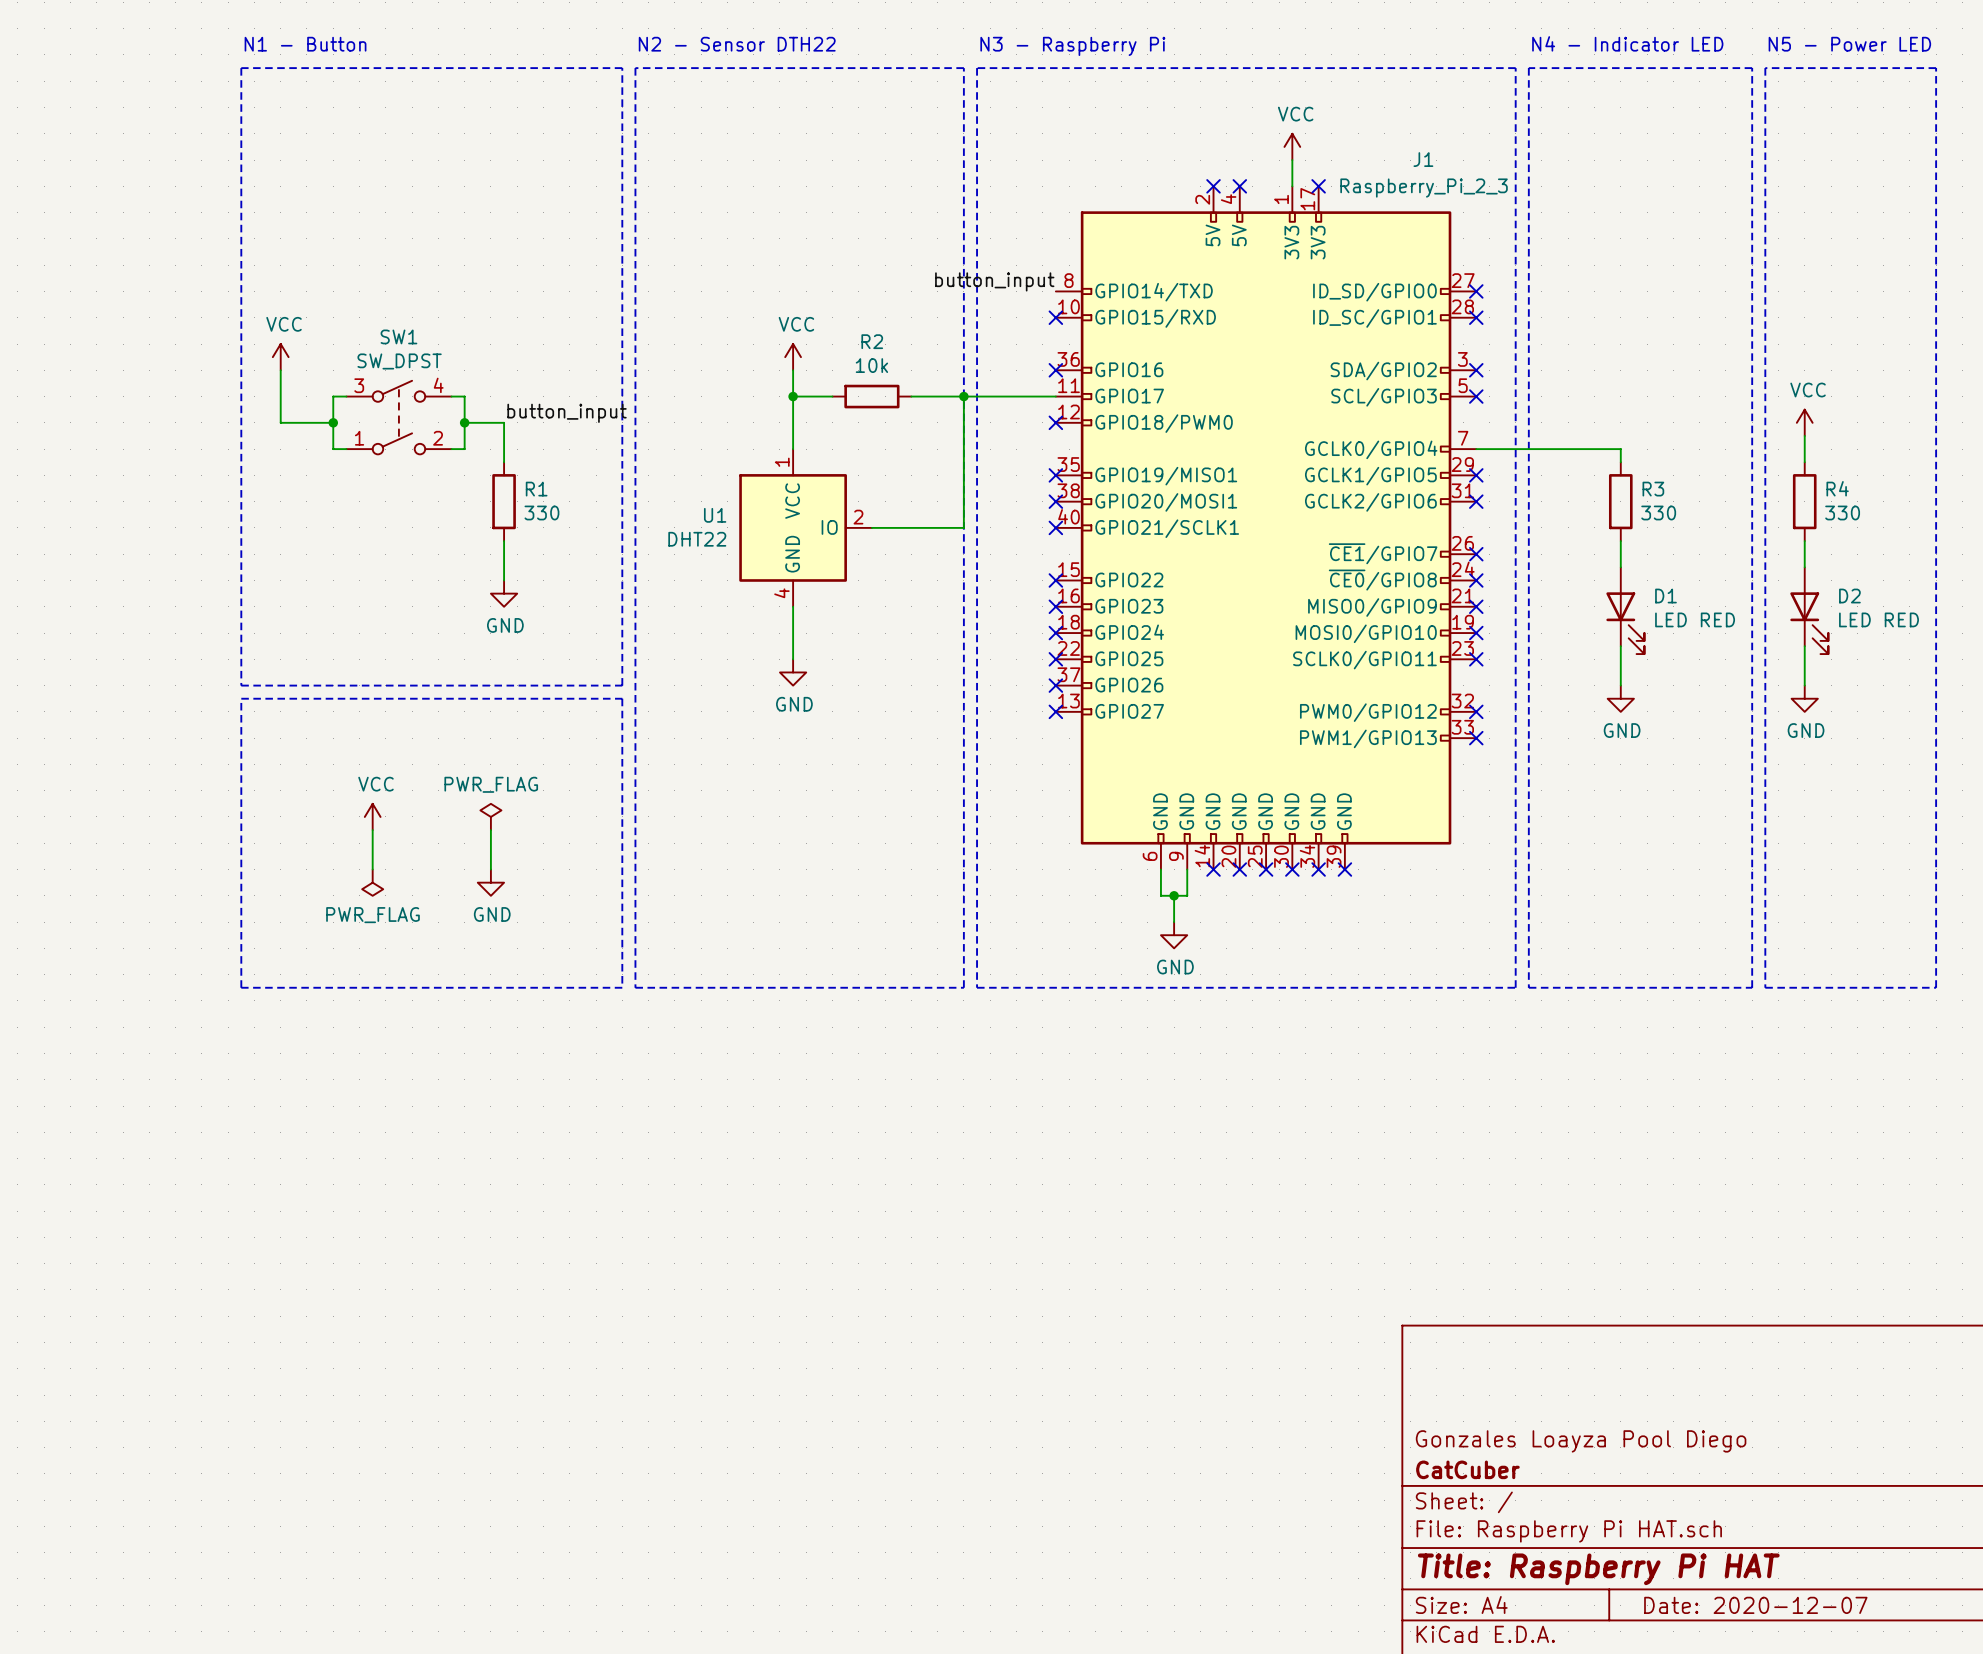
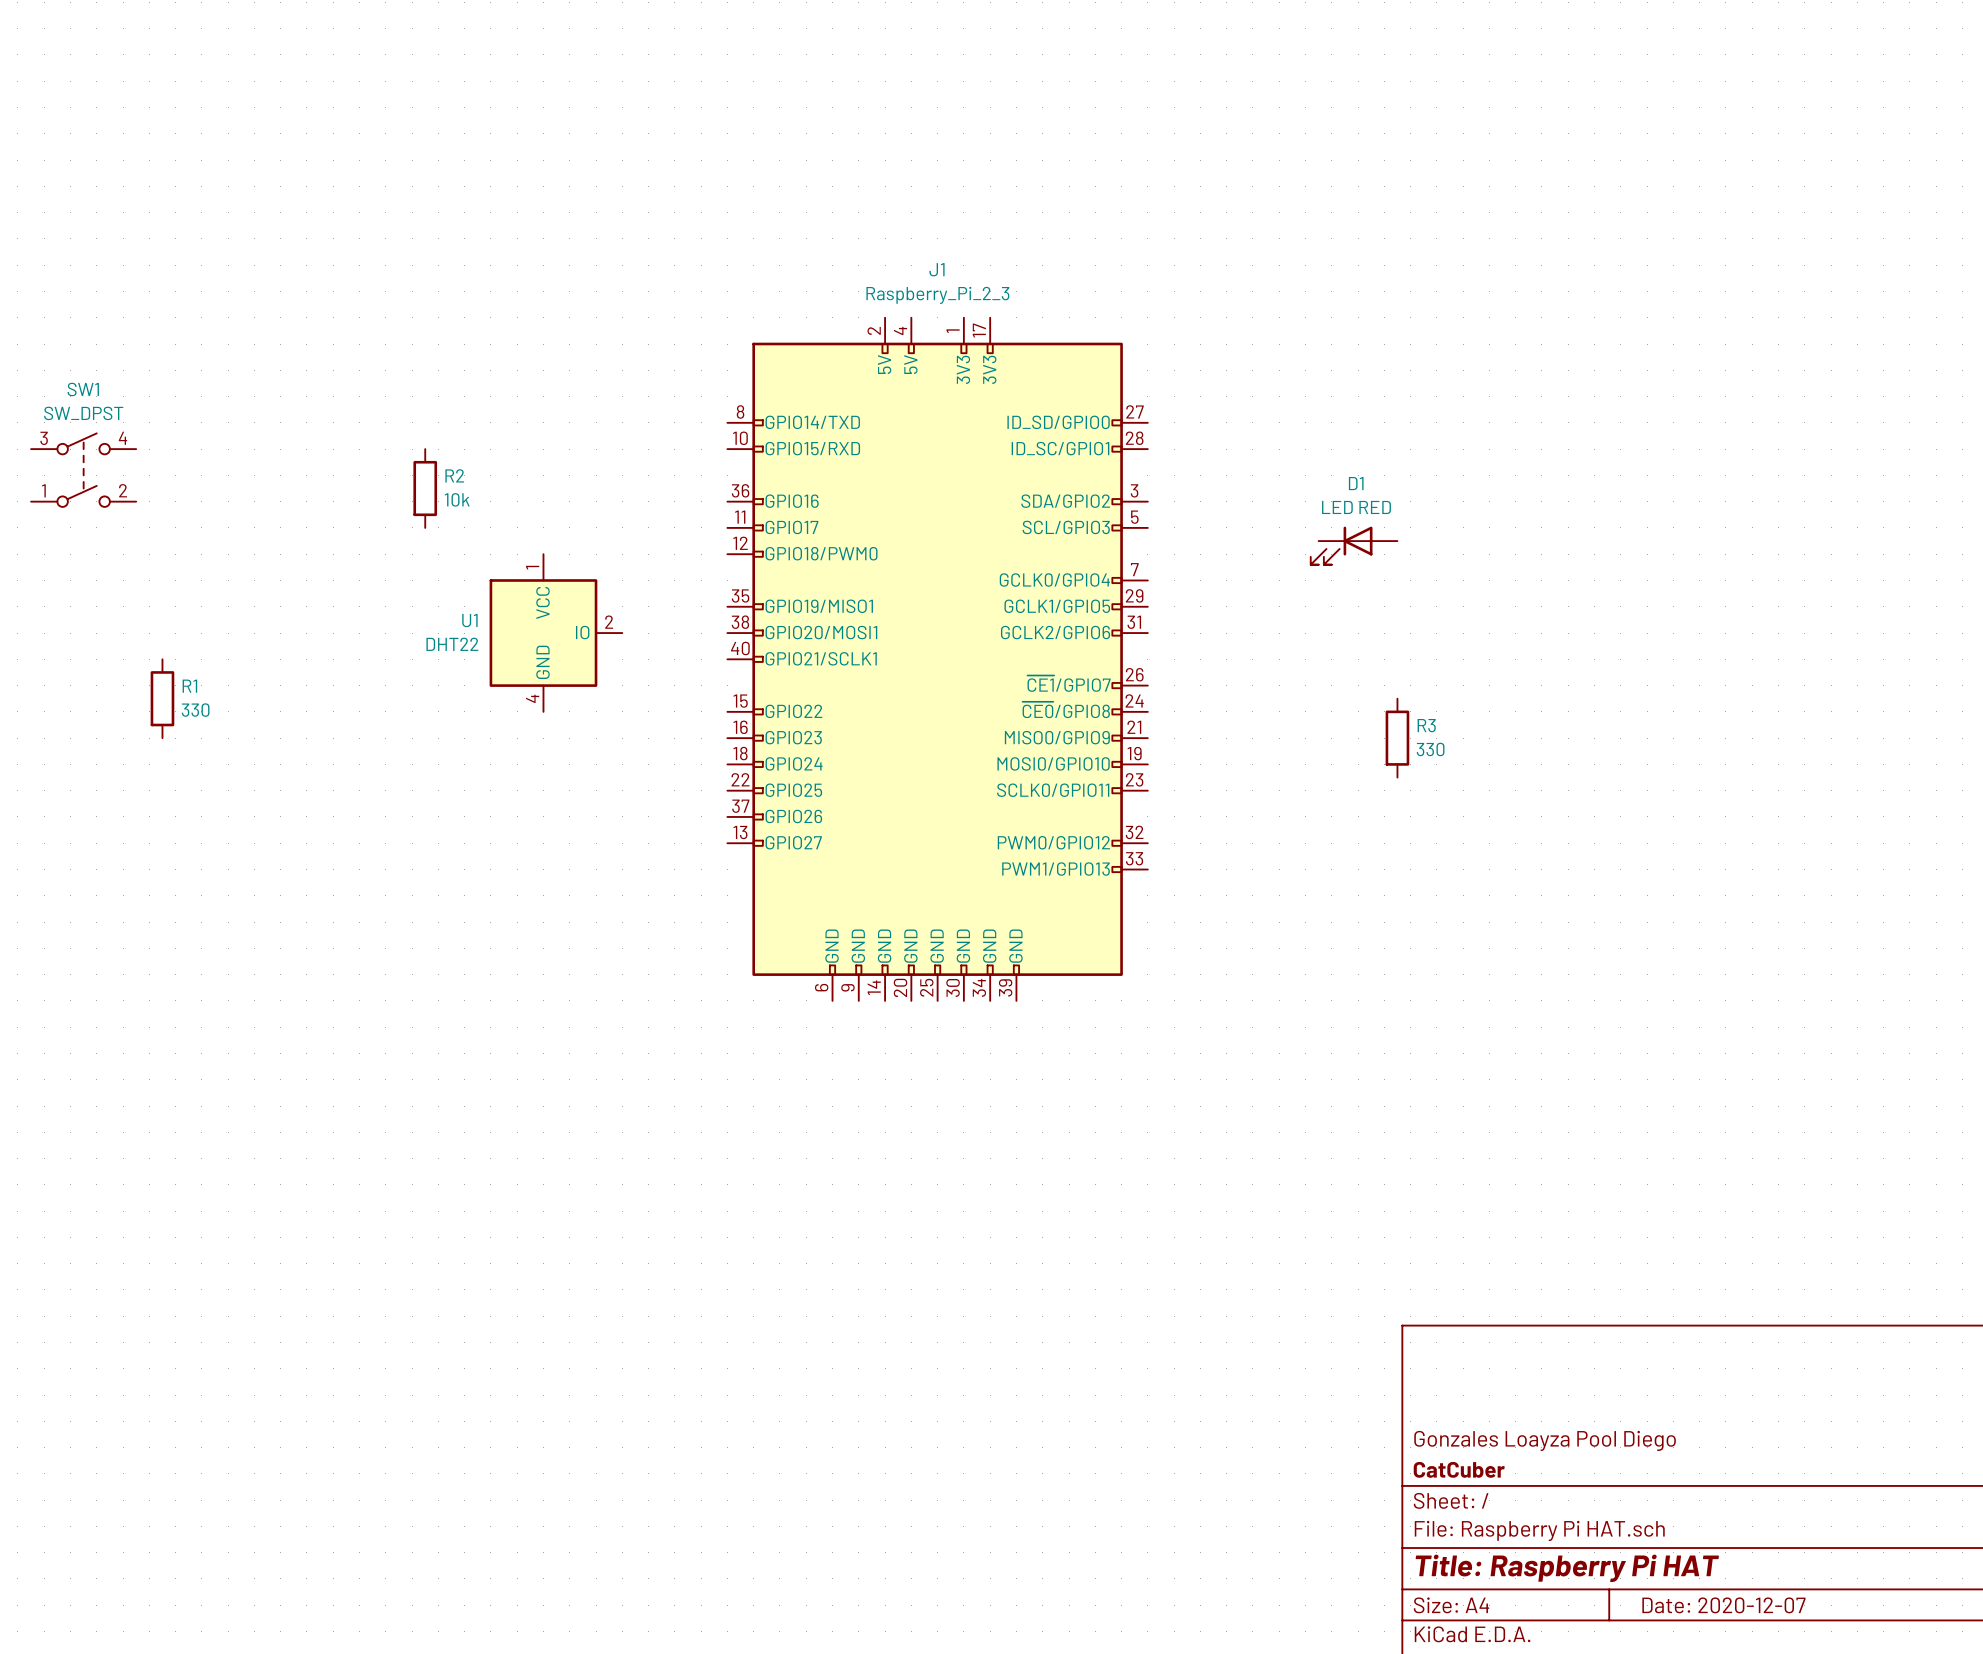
text: N4 - Indicator LED (1627, 43) -> none
text: N1 - Button (305, 44) -> none
text: N2 - Sensor DTH22 (737, 44) -> none
text: N5 - Power LED (1849, 44) -> none
text: N3 - Raspberry Pi (1072, 46) -> none
line: (241, 68) (241, 685) (622, 685) (622, 68) (241, 68) -> none
line: (635, 68) (963, 68) (963, 987) (635, 987) (635, 68) -> none
line: (977, 68) (1515, 68) (1515, 987) (977, 987) (977, 68) -> none
line: (1528, 68) (1752, 68) (1752, 987) (1528, 987) (1528, 68) -> none
line: (1765, 68) (1936, 68) (1936, 987) (1765, 987) (1765, 68) -> none
power symbol: VCC (1292, 146) -> none
J1 name position: J1 (1423, 159) -> J1 (937, 269)
wire: (1292, 160) (1292, 186) -> none
no-connect mark: (1213, 186) -> none
no-connect mark: (1239, 186) -> none
no-connect mark: (1318, 186) -> none
J1 value position: Raspberry_Pi_2_3 (1424, 188) -> Raspberry_Pi_2_3 (937, 295)
label: button_input (994, 281) -> none
no-connect mark: (1476, 291) -> none
no-connect mark: (1055, 317) -> none
no-connect mark: (1476, 317) -> none
R2 name position: R2 (872, 341) -> R2 (454, 475)
power symbol: VCC (280, 357) -> none
power symbol: VCC (793, 357) -> none
wire: (280, 370) (280, 422) (333, 422) -> none
no-connect mark: (1055, 370) -> none
no-connect mark: (1476, 370) -> none
wire: (346, 396) (333, 396) (333, 449) (346, 449) -> none
wire: (451, 396) (464, 396) (464, 449) (451, 449) -> none
junction: (793, 396) -> none
R2 rotation: 0° (871, 396) -> 90° clockwise (425, 488)
R2 position: (871, 396) -> (425, 488)
junction: (963, 396) -> none
no-connect mark: (1476, 396) -> none
label: button_input (567, 413) -> none
SW1 position: (398, 417) -> (83, 470)
junction: (333, 422) -> none
wire: (464, 422) (504, 422) (504, 462) -> none
junction: (464, 422) -> none
no-connect mark: (1055, 422) -> none
power symbol: VCC (1804, 422) -> none
wire: (1804, 435) (1804, 462) -> none
wire: (1476, 449) (1620, 449) (1620, 462) -> none
no-connect mark: (1055, 475) -> none
no-connect mark: (1476, 475) -> none
R1 position: (504, 501) -> (162, 698)
no-connect mark: (1055, 501) -> none
no-connect mark: (1476, 501) -> none
R3 position: (1620, 501) -> (1397, 738)
R4: 330 (1804, 501) -> none
U1 position: (805, 527) -> (555, 633)
no-connect mark: (1055, 527) -> none
J1 position: (1266, 527) -> (937, 659)
wire: (504, 541) (504, 580) -> none
wire: (1620, 541) (1620, 567) -> none
wire: (1804, 541) (1804, 567) -> none
no-connect mark: (1476, 554) -> none
no-connect mark: (1055, 580) -> none
no-connect mark: (1476, 580) -> none
power symbol: GND (504, 593) -> none
D1 name position: D1 (1665, 596) -> D1 (1356, 483)
no-connect mark: (1055, 606) -> none
no-connect mark: (1476, 606) -> none
D1 position: (1625, 610) -> (1354, 545)
D2: LED RED (1809, 610) -> none
D1 value position: LED RED (1695, 619) -> LED RED (1356, 507)
D1 rotation: 0° (1625, 623) -> 90° clockwise (1341, 545)
no-connect mark: (1055, 633) -> none
no-connect mark: (1476, 633) -> none
wire: (1620, 646) (1620, 685) -> none
wire: (1804, 646) (1804, 685) -> none
no-connect mark: (1055, 659) -> none
no-connect mark: (1476, 659) -> none
power symbol: GND (793, 672) -> none
no-connect mark: (1055, 685) -> none
line: (241, 698) (241, 987) (622, 987) (622, 698) (241, 698) -> none
power symbol: GND (1620, 698) -> none
power symbol: GND (1804, 698) -> none
no-connect mark: (1055, 711) -> none
no-connect mark: (1476, 711) -> none
no-connect mark: (1476, 738) -> none
power symbol: VCC (372, 816) -> none
power symbol: PWR_FLAG (490, 816) -> none
wire: (372, 830) (372, 869) -> none
wire: (490, 830) (490, 869) -> none
wire: (1160, 869) (1160, 895) (1187, 895) (1187, 869) -> none
no-connect mark: (1213, 869) -> none
no-connect mark: (1239, 869) -> none
no-connect mark: (1266, 869) -> none
no-connect mark: (1292, 869) -> none
no-connect mark: (1318, 869) -> none
no-connect mark: (1344, 869) -> none
power symbol: PWR_FLAG (372, 882) -> none
power symbol: GND (490, 882) -> none
wire: (1174, 895) (1174, 922) -> none
junction: (1174, 895) -> none
power symbol: GND (1174, 935) -> none

